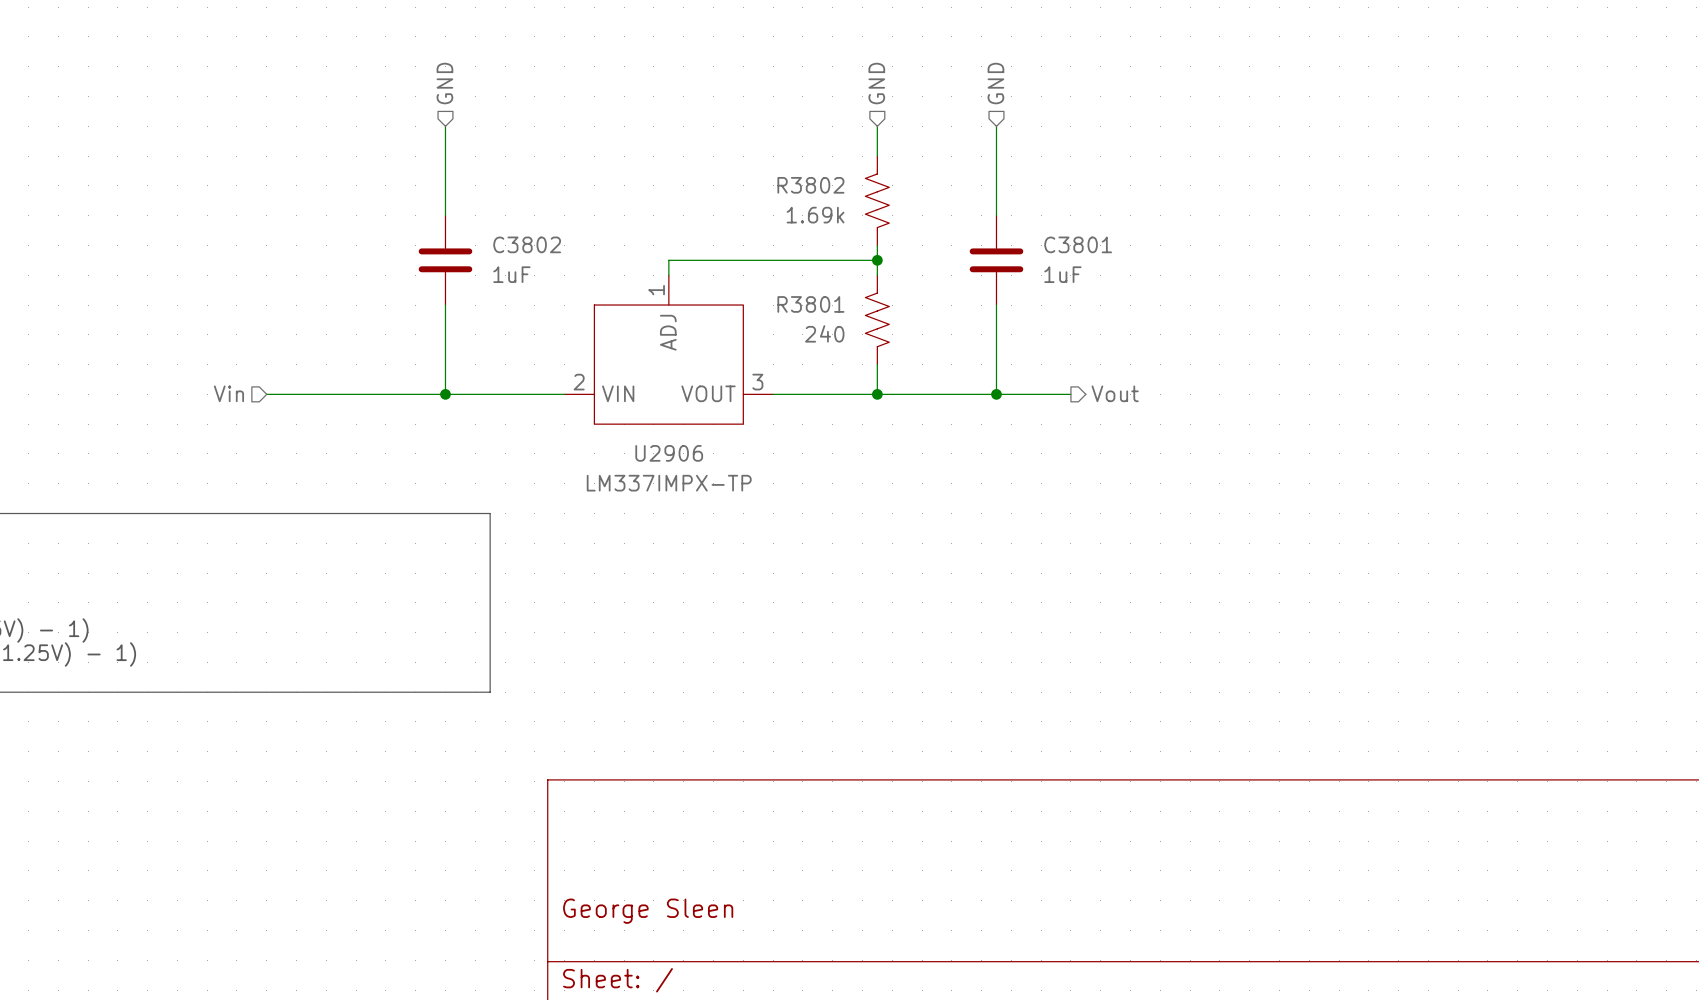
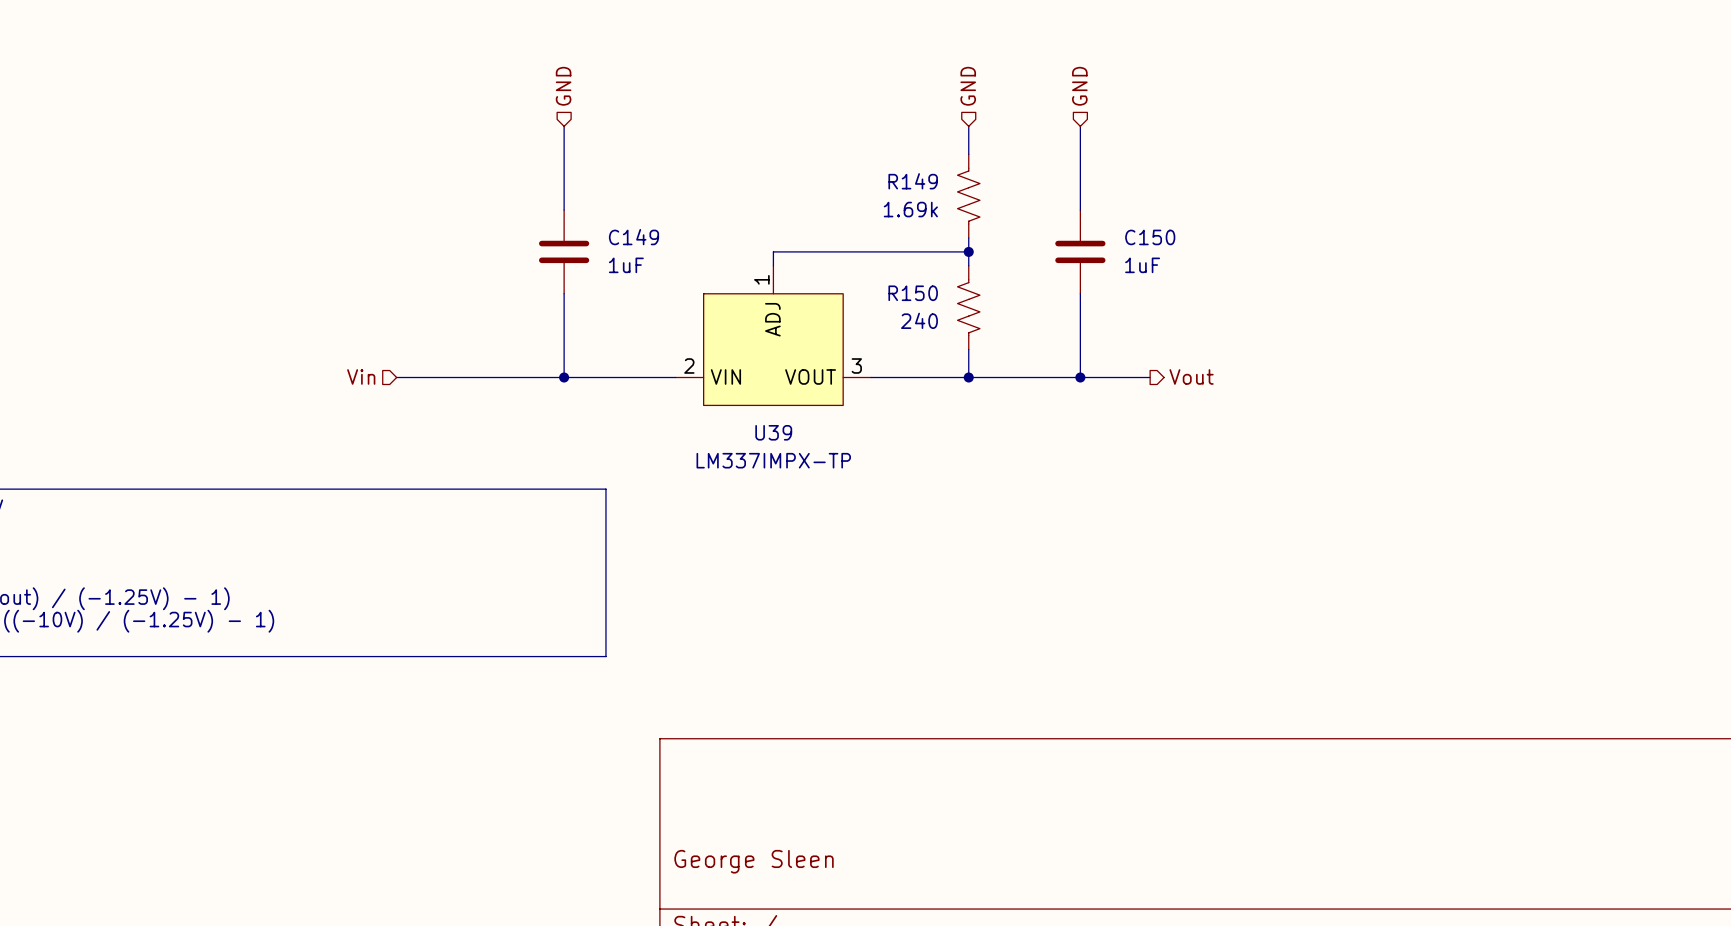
R3802 name: R3802 (810, 185) -> R149 (913, 181)
C3802 name: C3802 (527, 244) -> C149 (633, 237)
C3801 name: C3801 (1078, 244) -> C150 (1150, 237)
R3801 name: R3801 (810, 304) -> R150 (913, 293)
U2906 name: U2906 (669, 453) -> U39 (773, 432)

